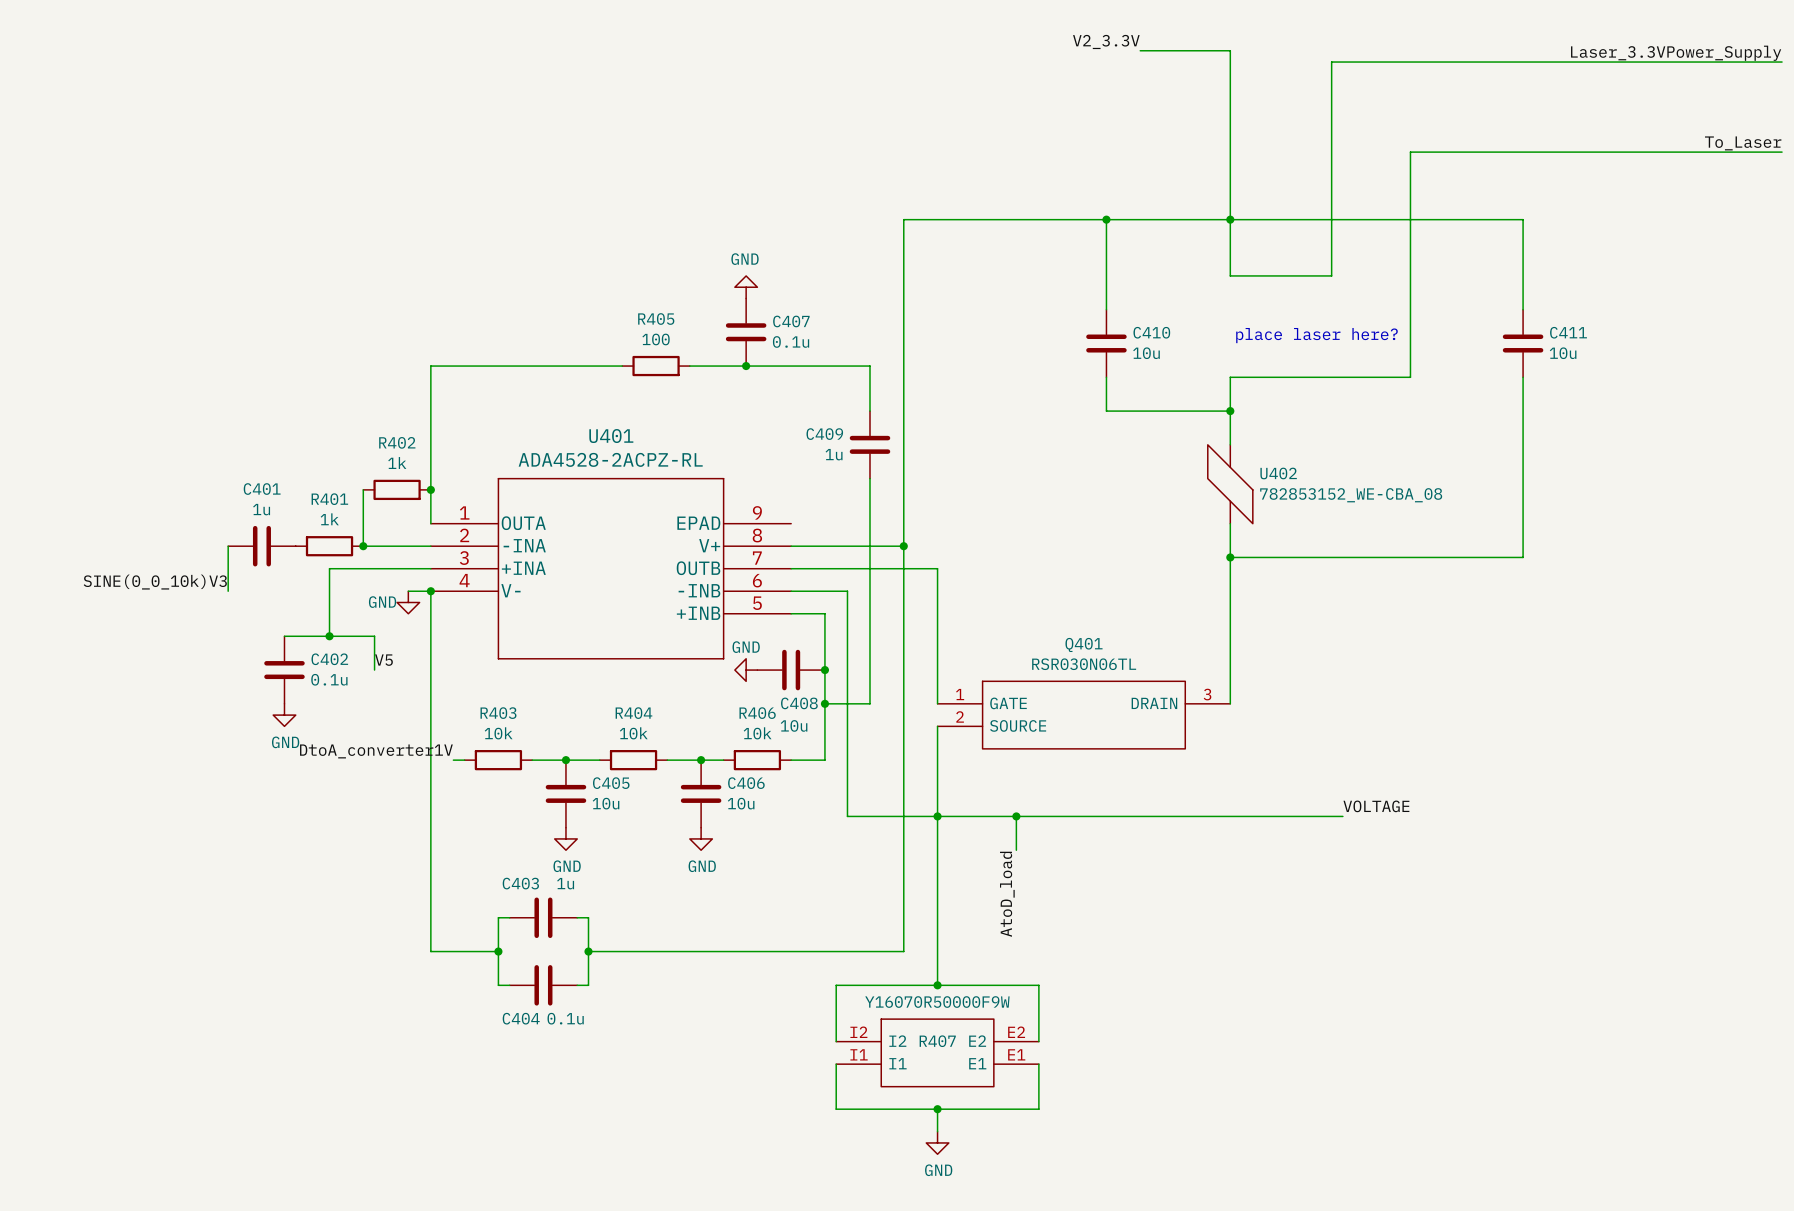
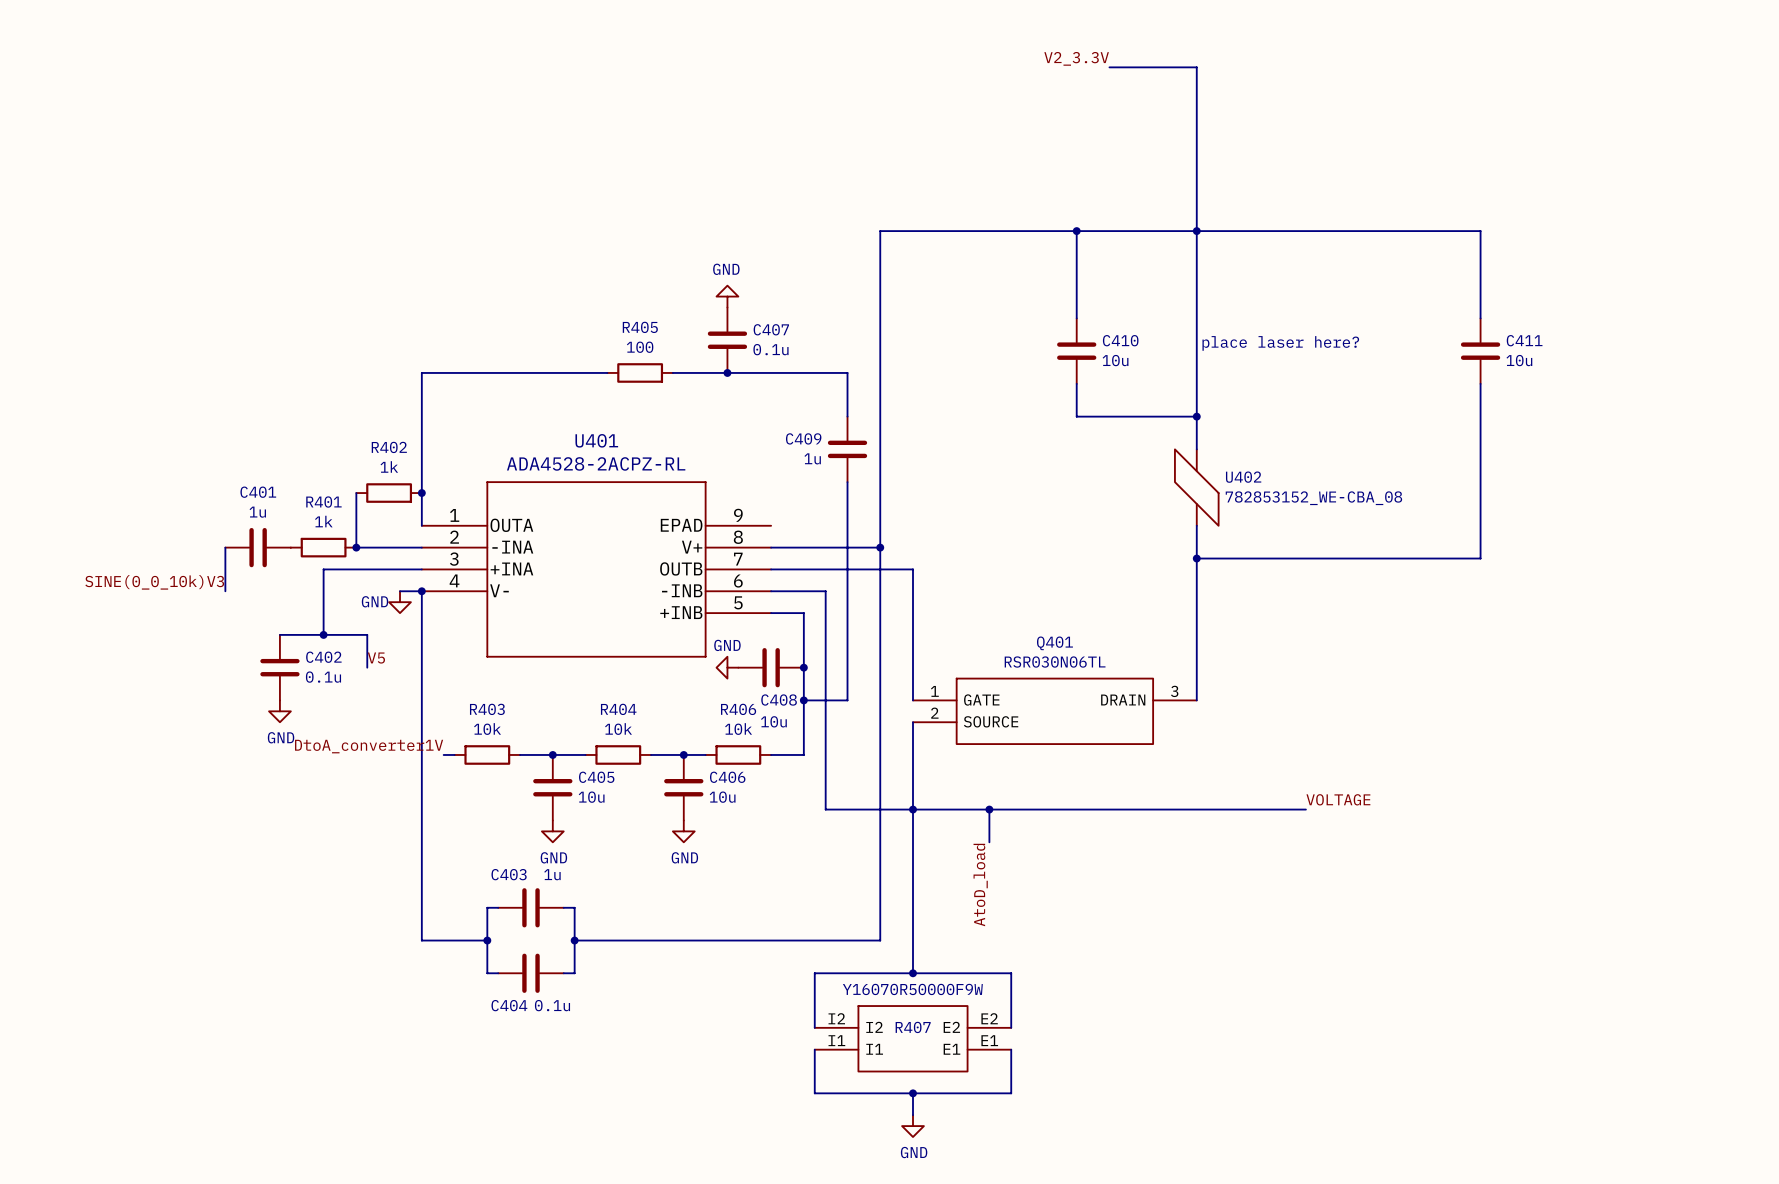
label: Laser_3.3VPower_Supply (1676, 53) -> none
wire: (1782, 62) (1331, 62) (1331, 275) (1230, 275) -> none
label: To_Laser (1743, 143) -> none
wire: (1782, 152) (1410, 152) (1410, 377) (1230, 377) -> (1196, 285) (1196, 383)

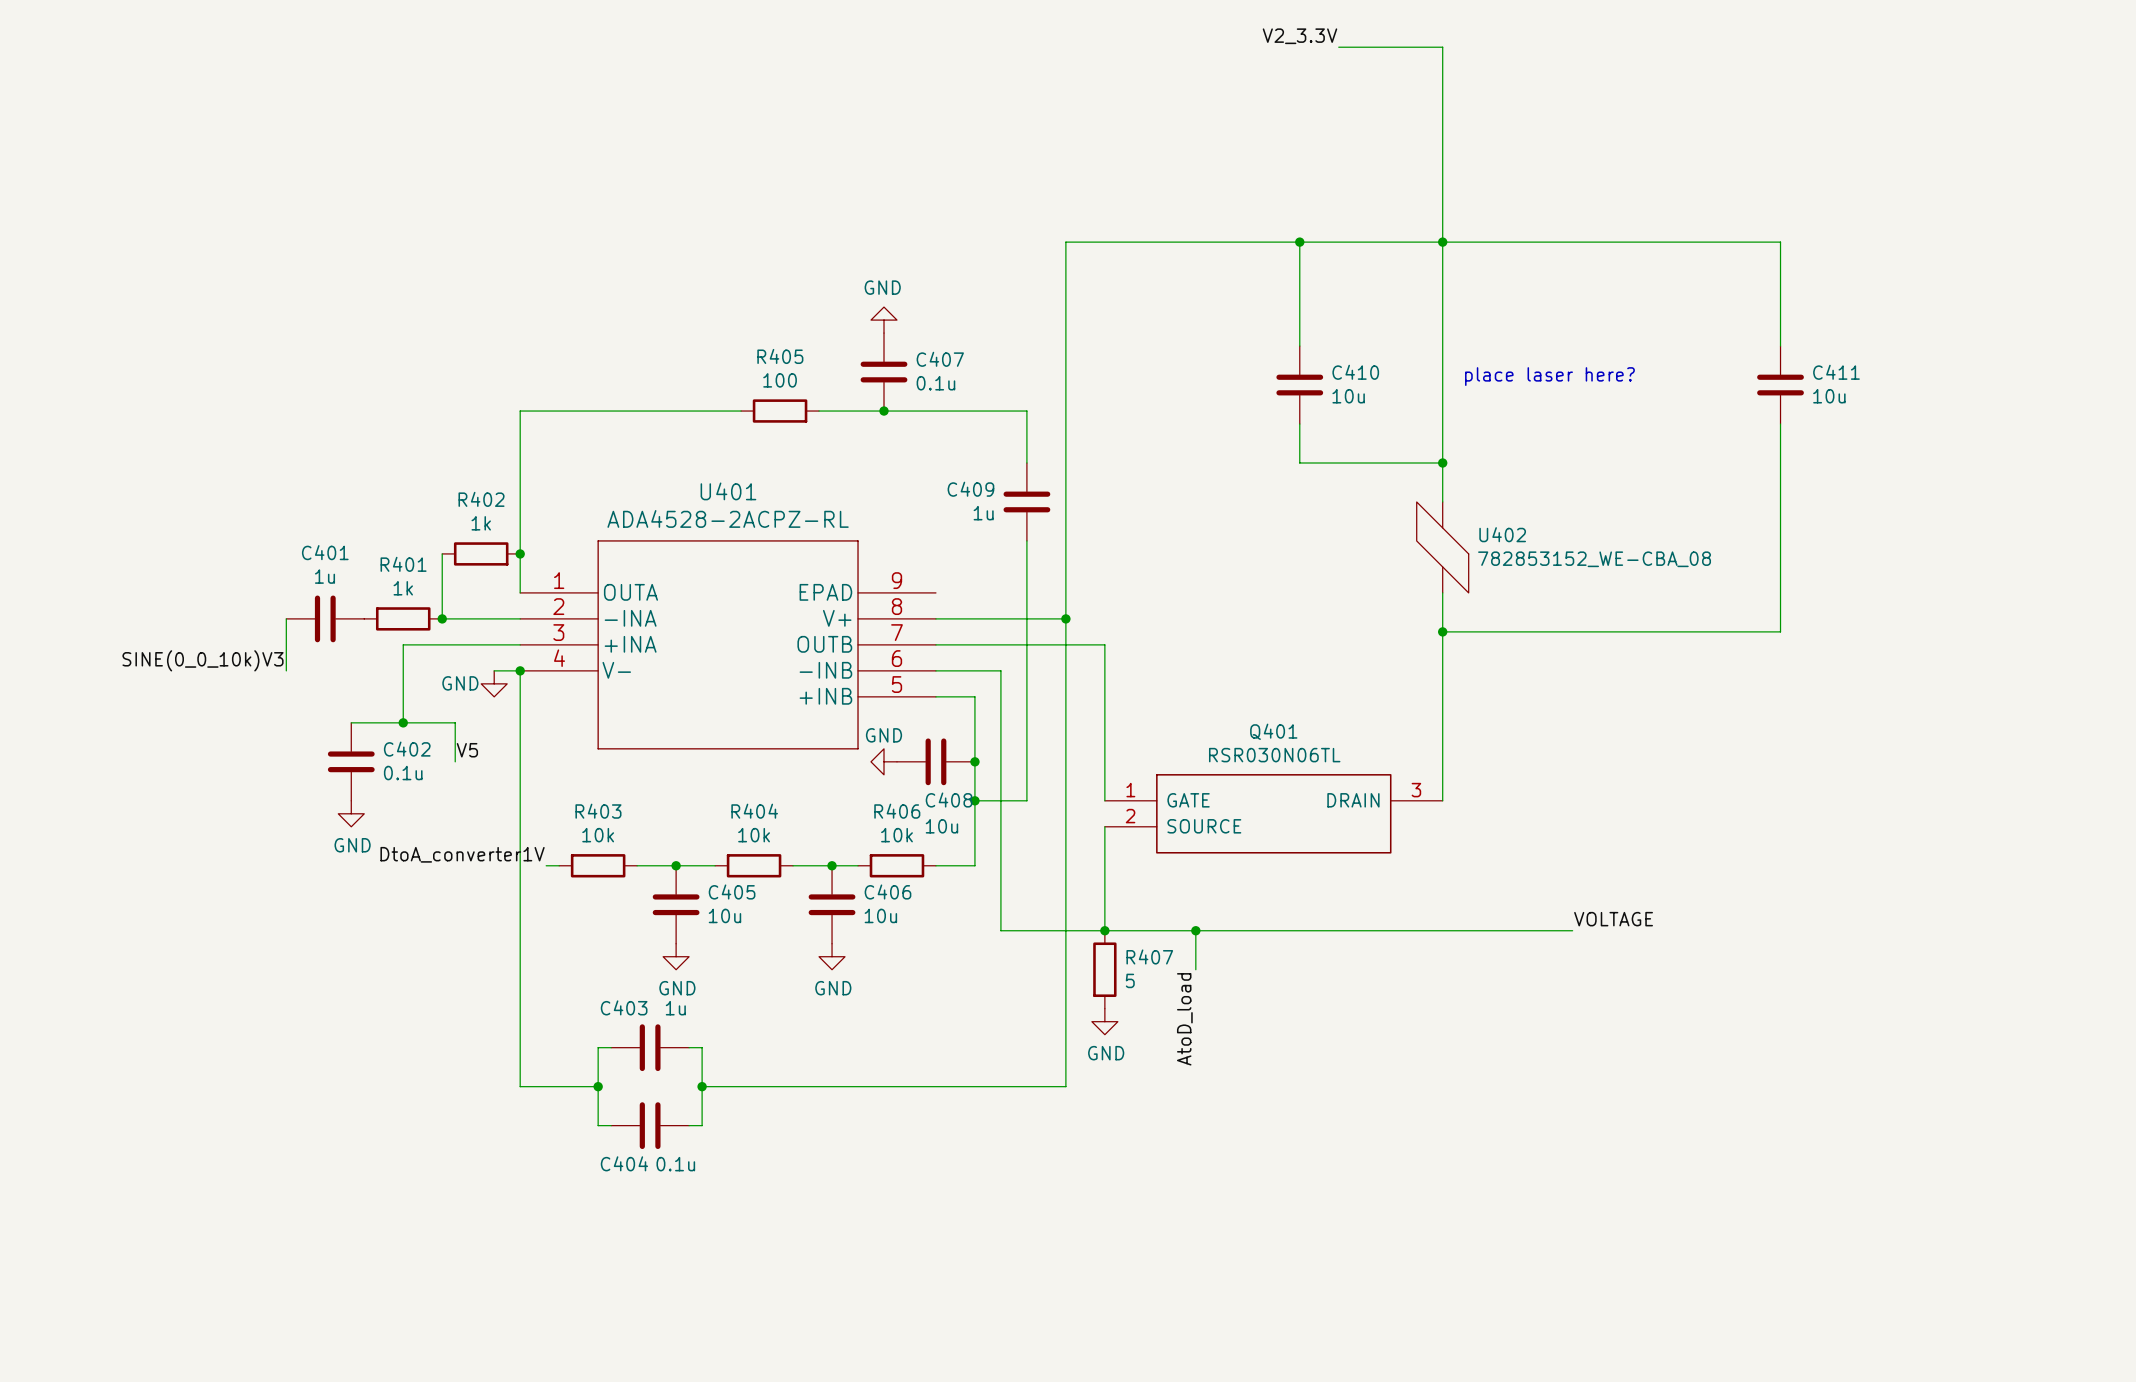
wire: (913, 809) (913, 973) -> none
power symbol: none -> GND (1104, 1021)
junction: (913, 973) -> none
R407 value: Y16070R50000F9W (912, 989) -> 5 (1130, 980)
R407 symbol: [814, 1005, 1012, 1073] -> [1093, 930, 1117, 1009]
wire: (814, 1027) (814, 973) (1011, 973) (1011, 1027) -> none
R407 name position: R407 (913, 1027) -> R407 (1149, 956)
wire: (814, 1049) (814, 1093) (1011, 1093) (1011, 1049) -> none
wire: (913, 1093) (913, 1115) -> none
junction: (913, 1093) -> none
power symbol: GND (913, 1126) -> none

